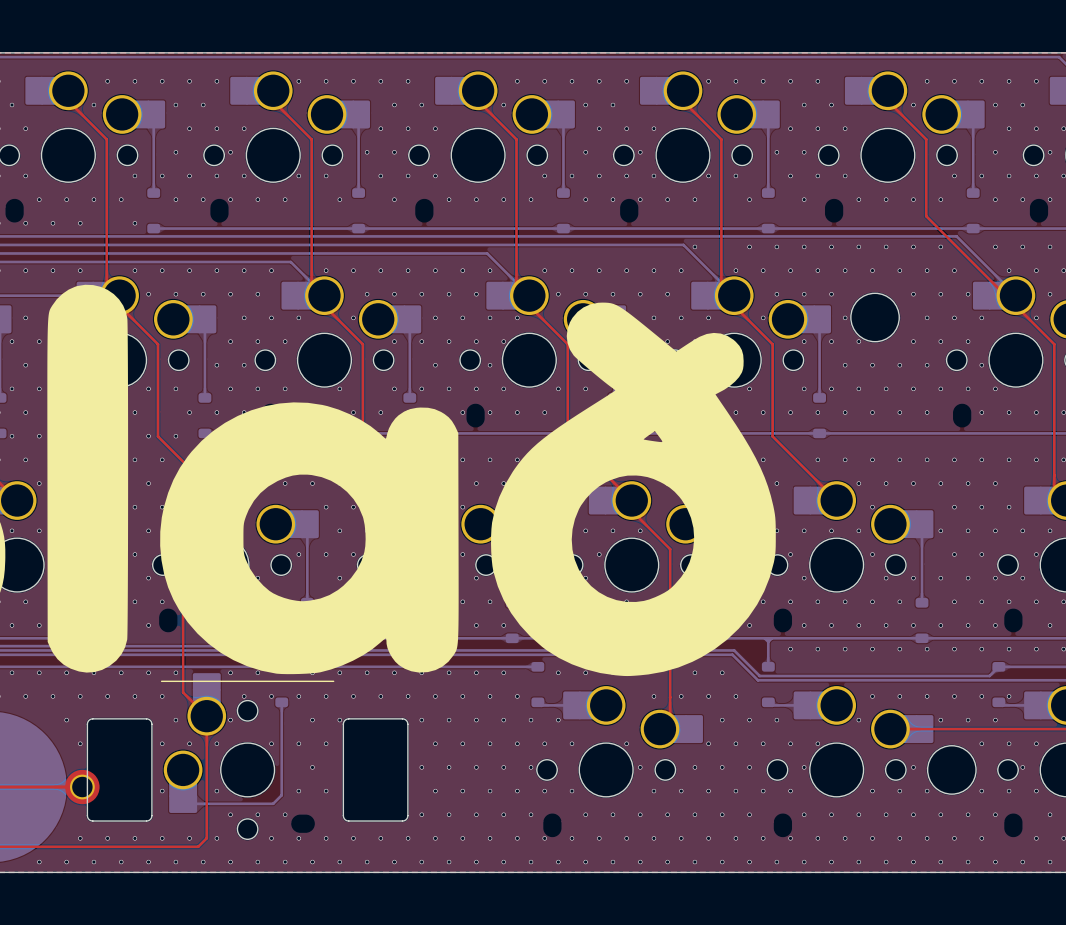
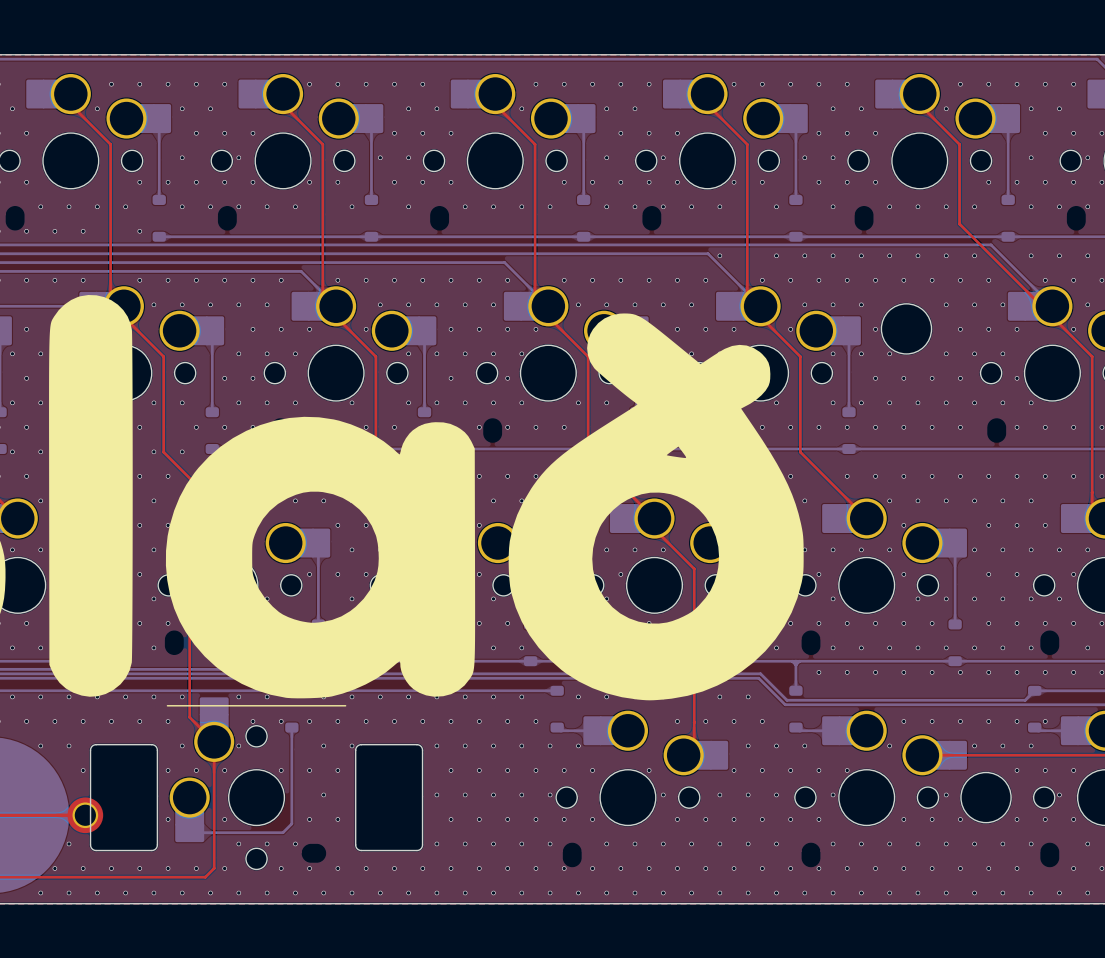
via: none -> (40, 745)
via: none -> (69, 843)
via: none -> (54, 868)

